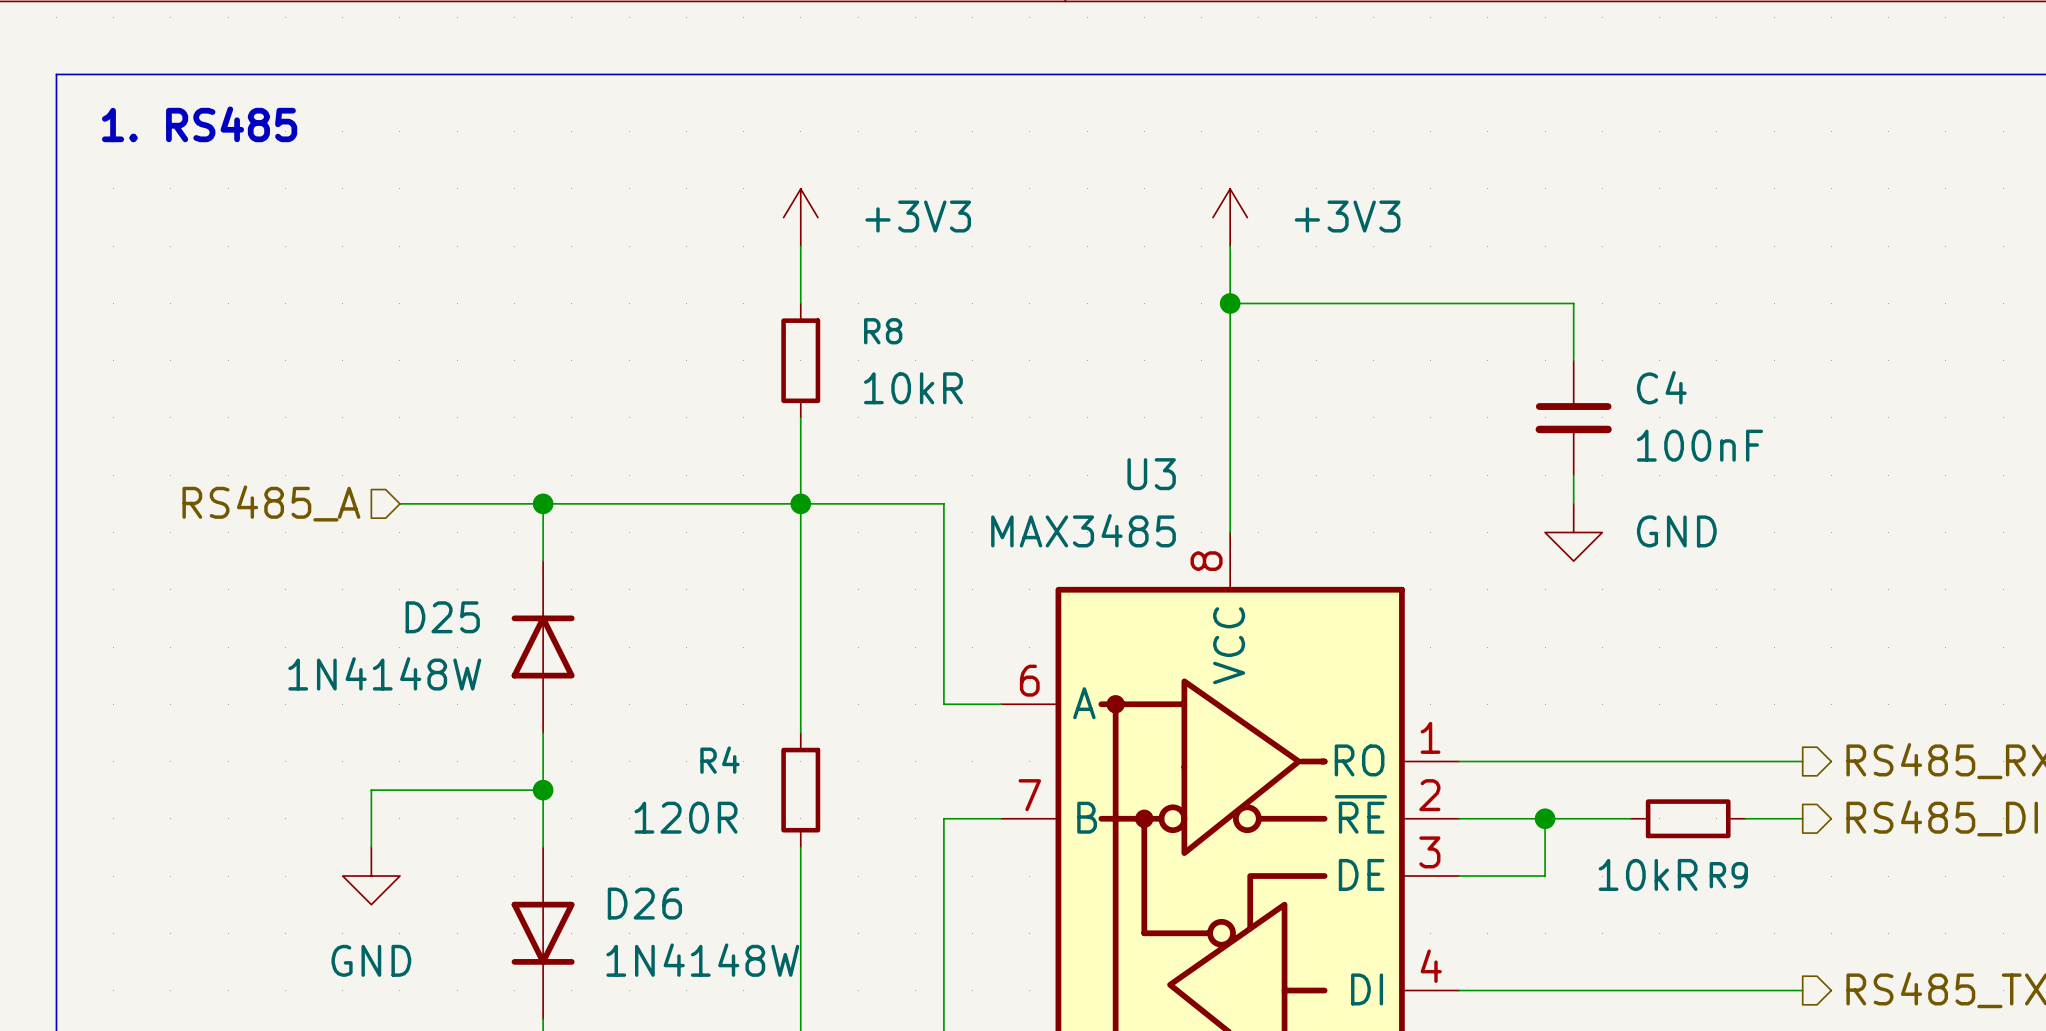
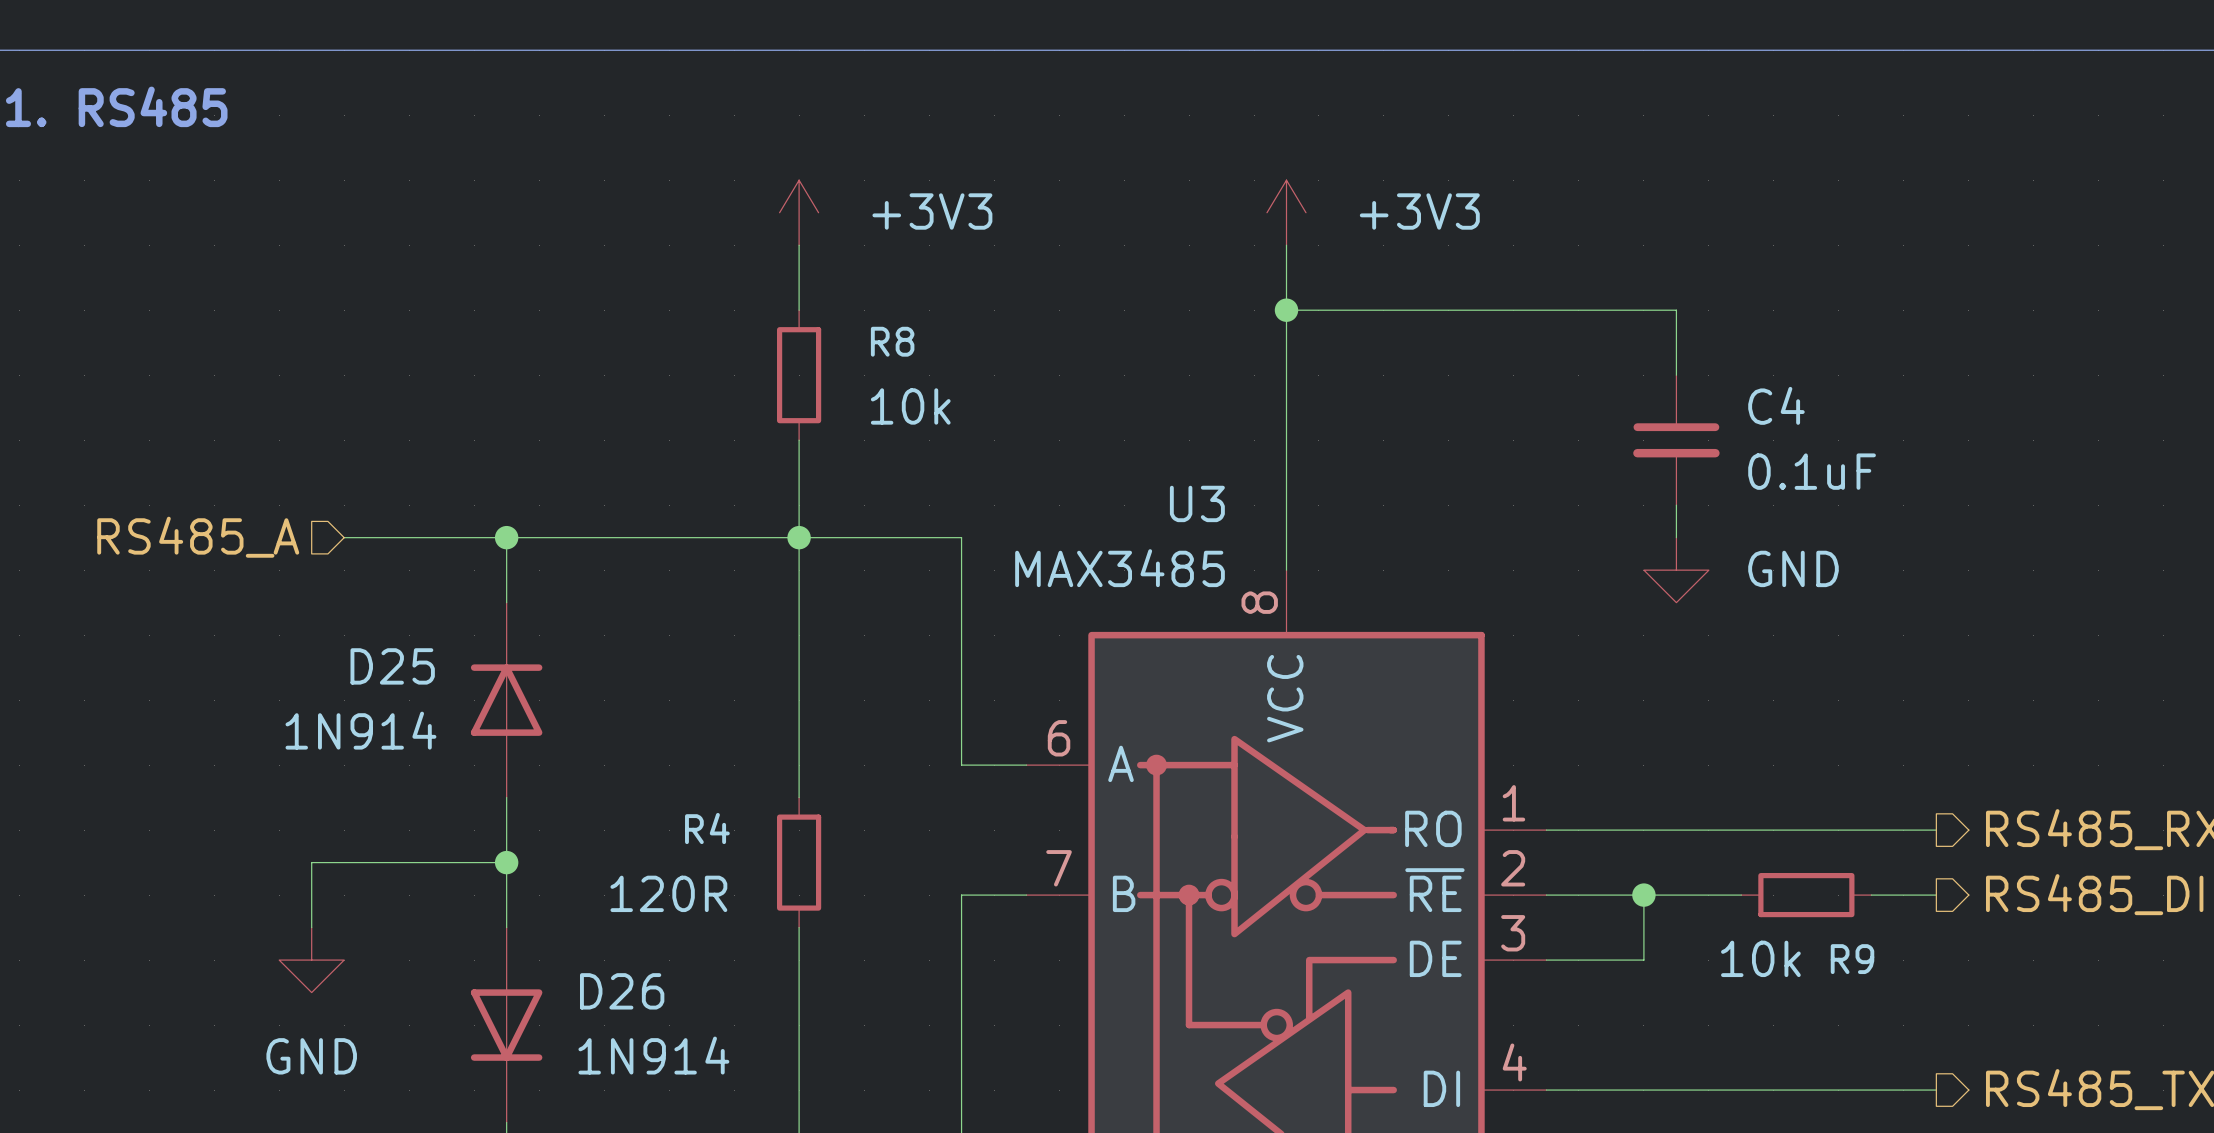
R8 value: 10kR (913, 388) -> 10k (910, 406)
C4 value: 100nF (1699, 445) -> 0.1uF (1812, 471)
D25 value: 1N4148W (384, 673) -> 1N914 (360, 730)
R9 value: 10kR (1648, 874) -> 10k (1760, 958)
D26 value: 1N4148W (702, 960) -> 1N914 (653, 1055)

